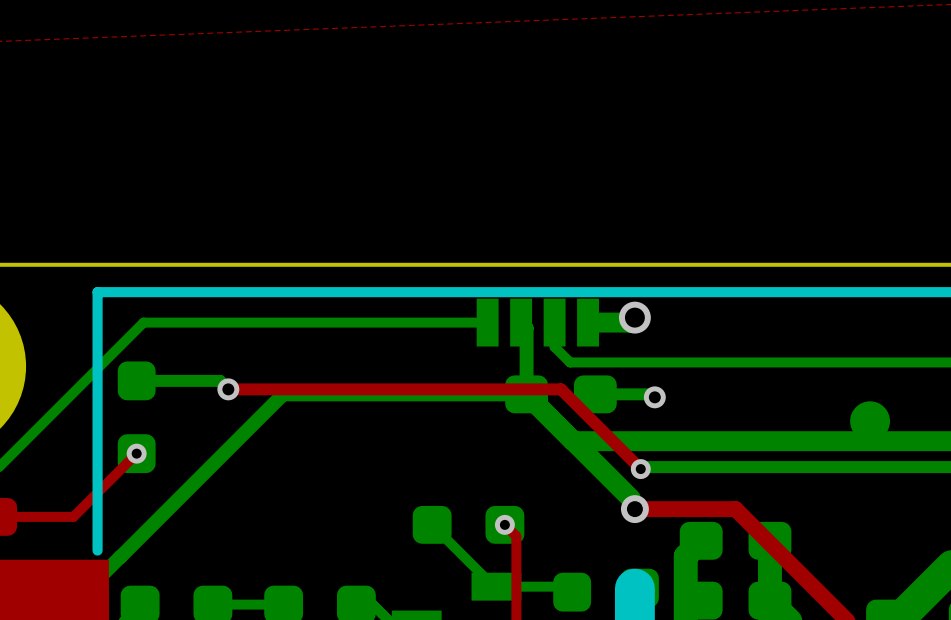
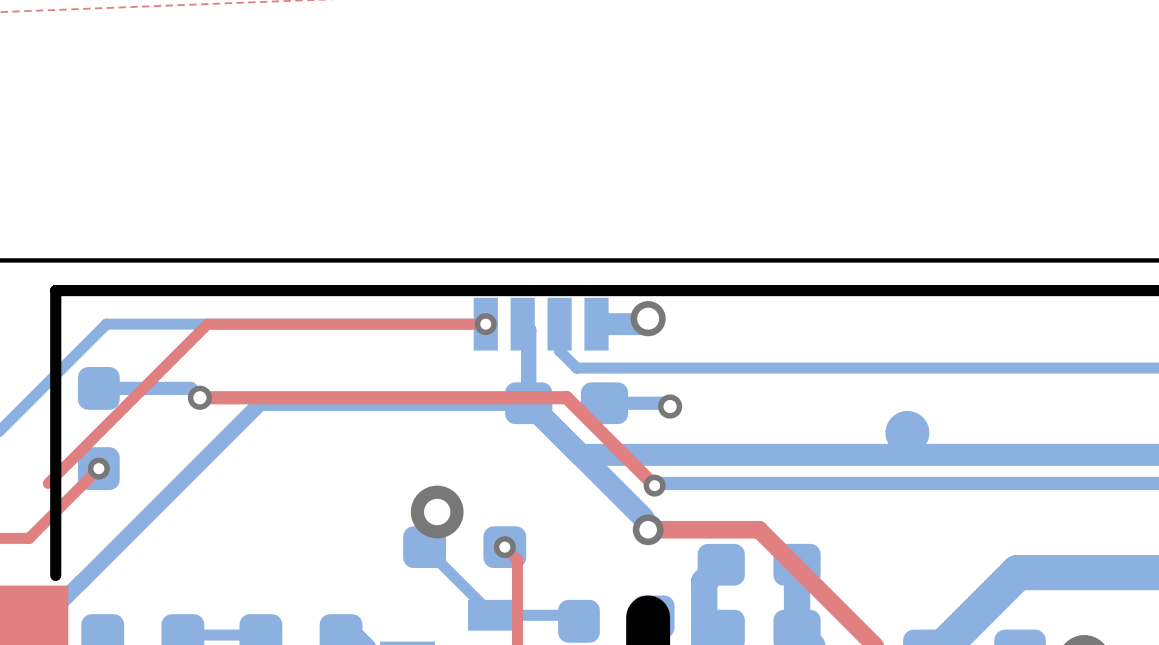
top track: none -> (485, 324) (207, 324) (48, 483)
via: none -> (485, 324)
via: none -> (437, 512)

